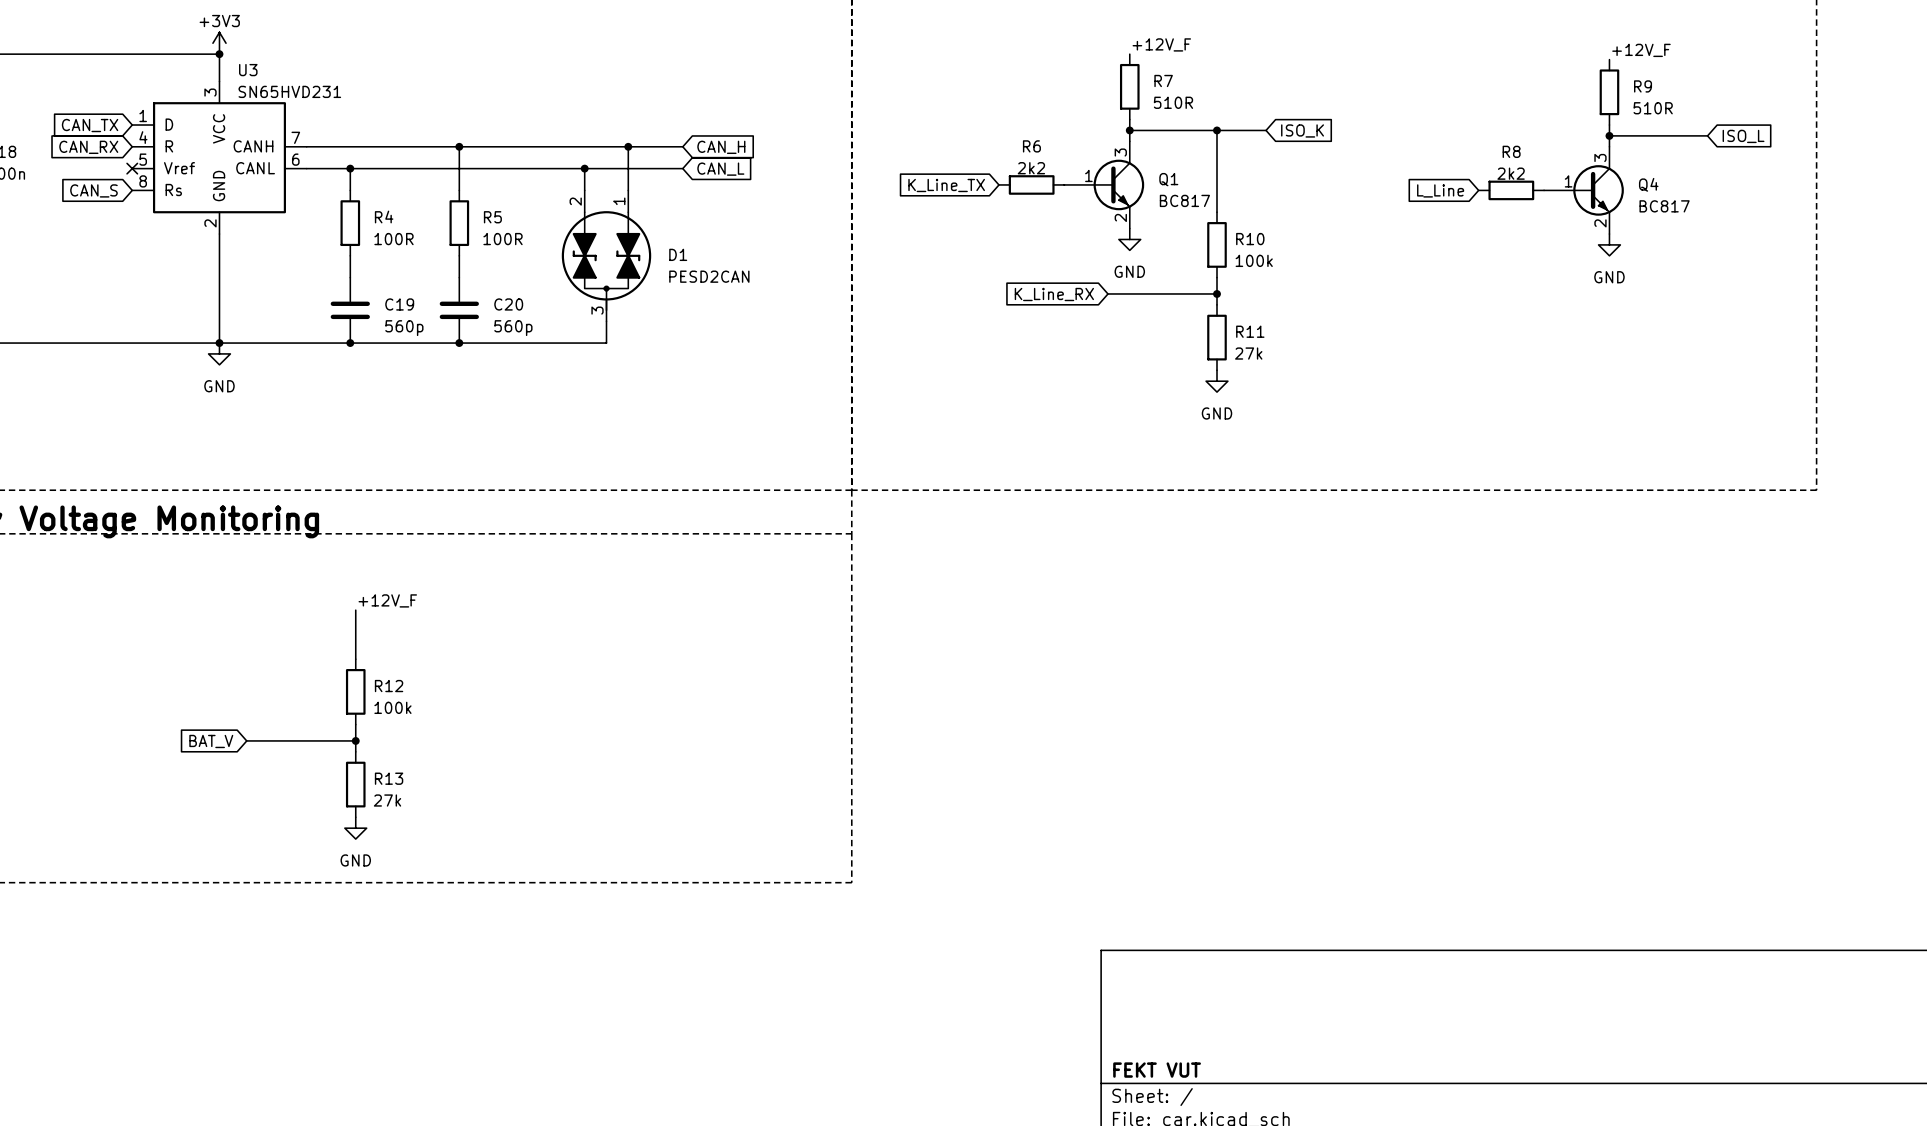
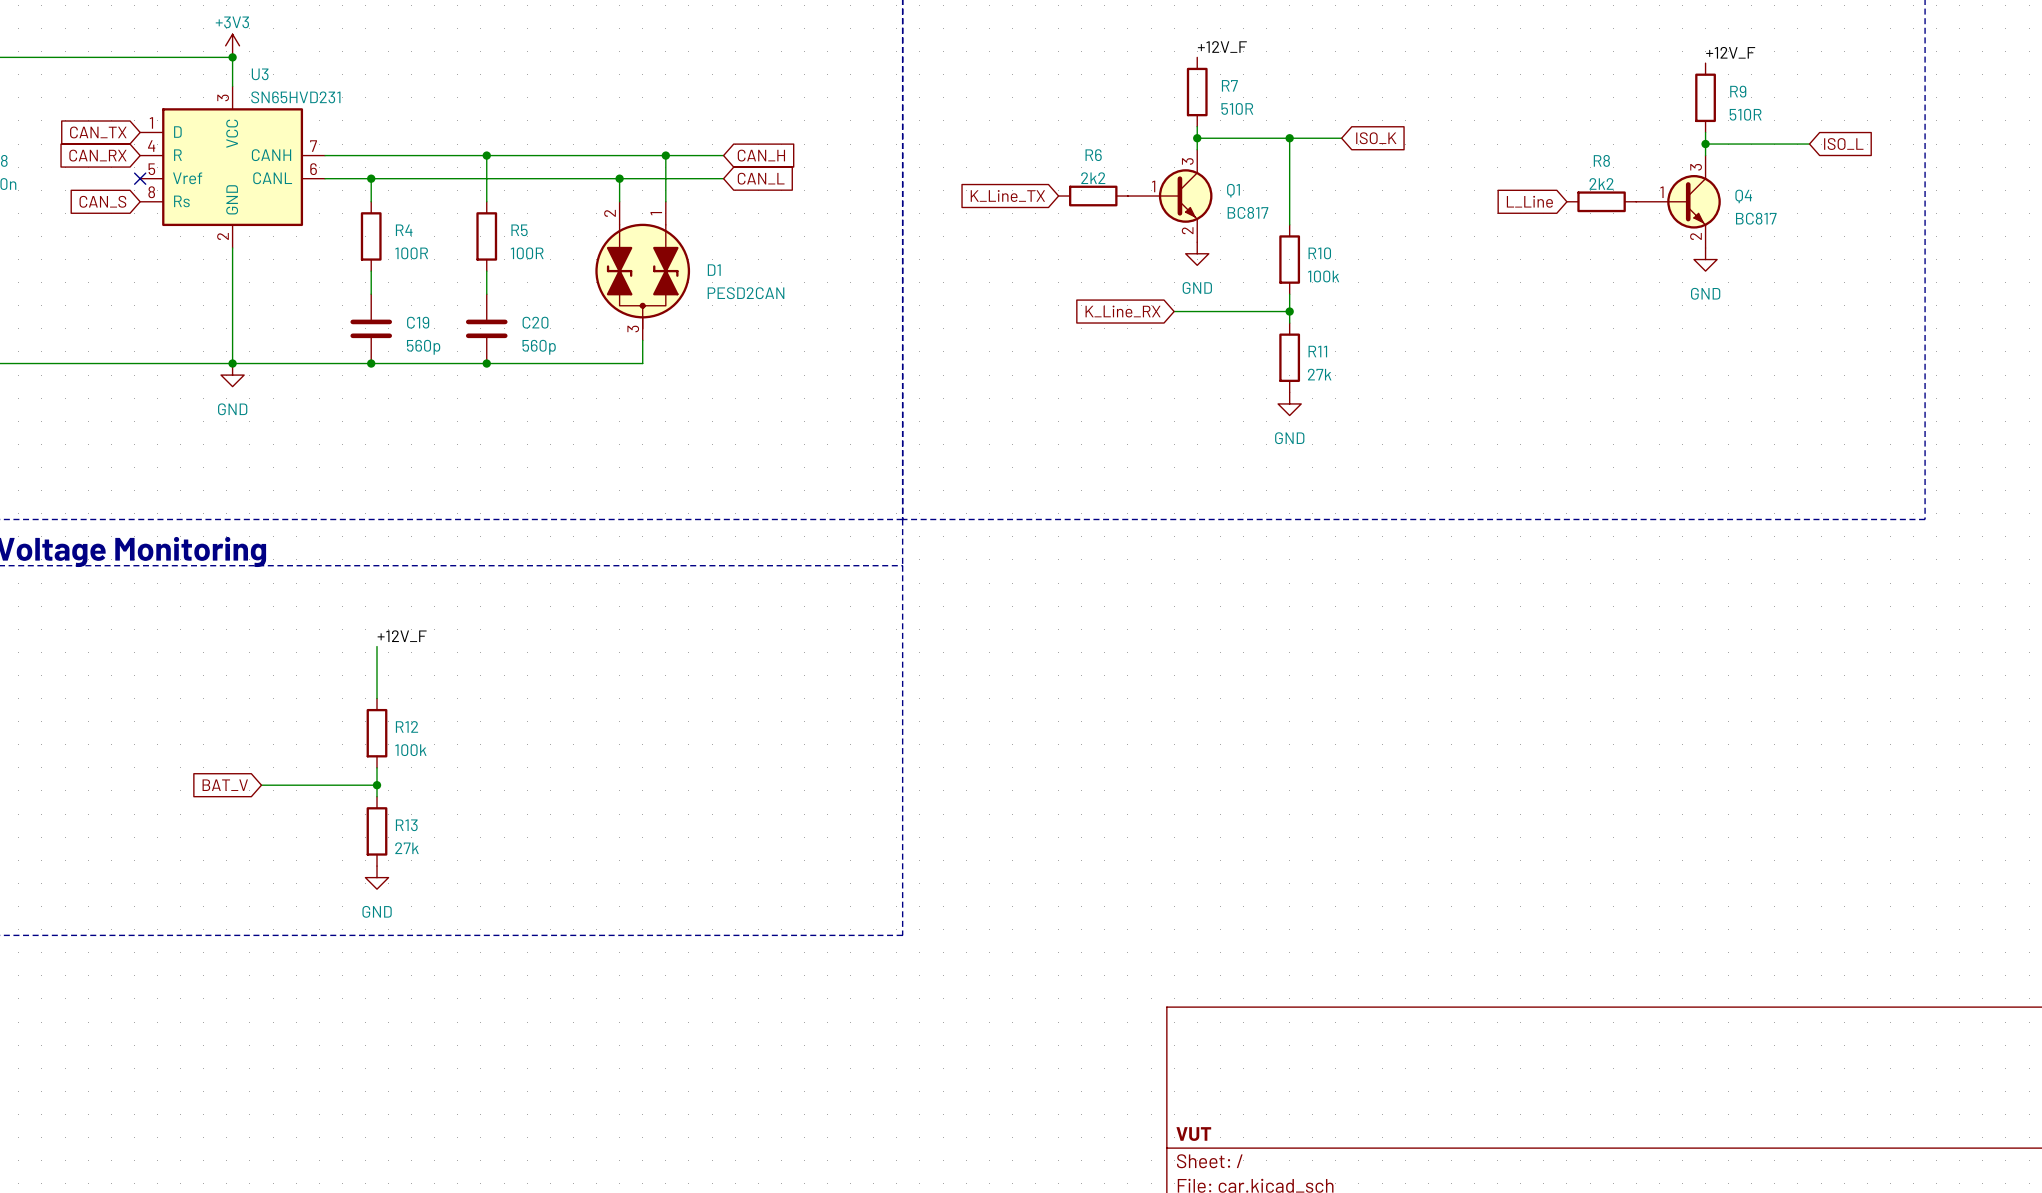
title block: FEKT VUT (1157, 1070) -> VUT (1193, 1134)

